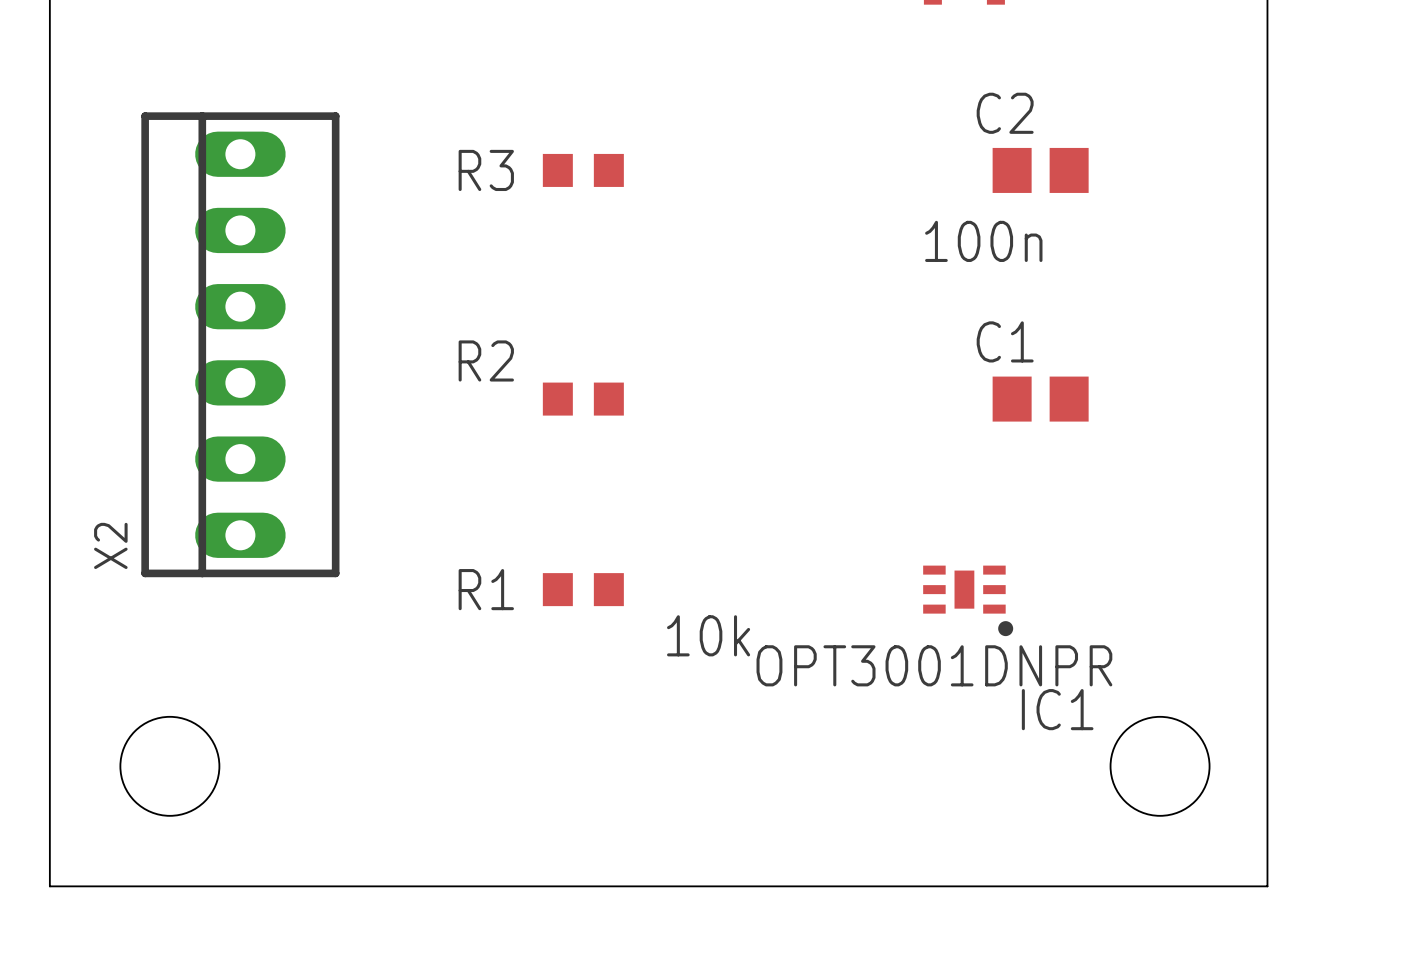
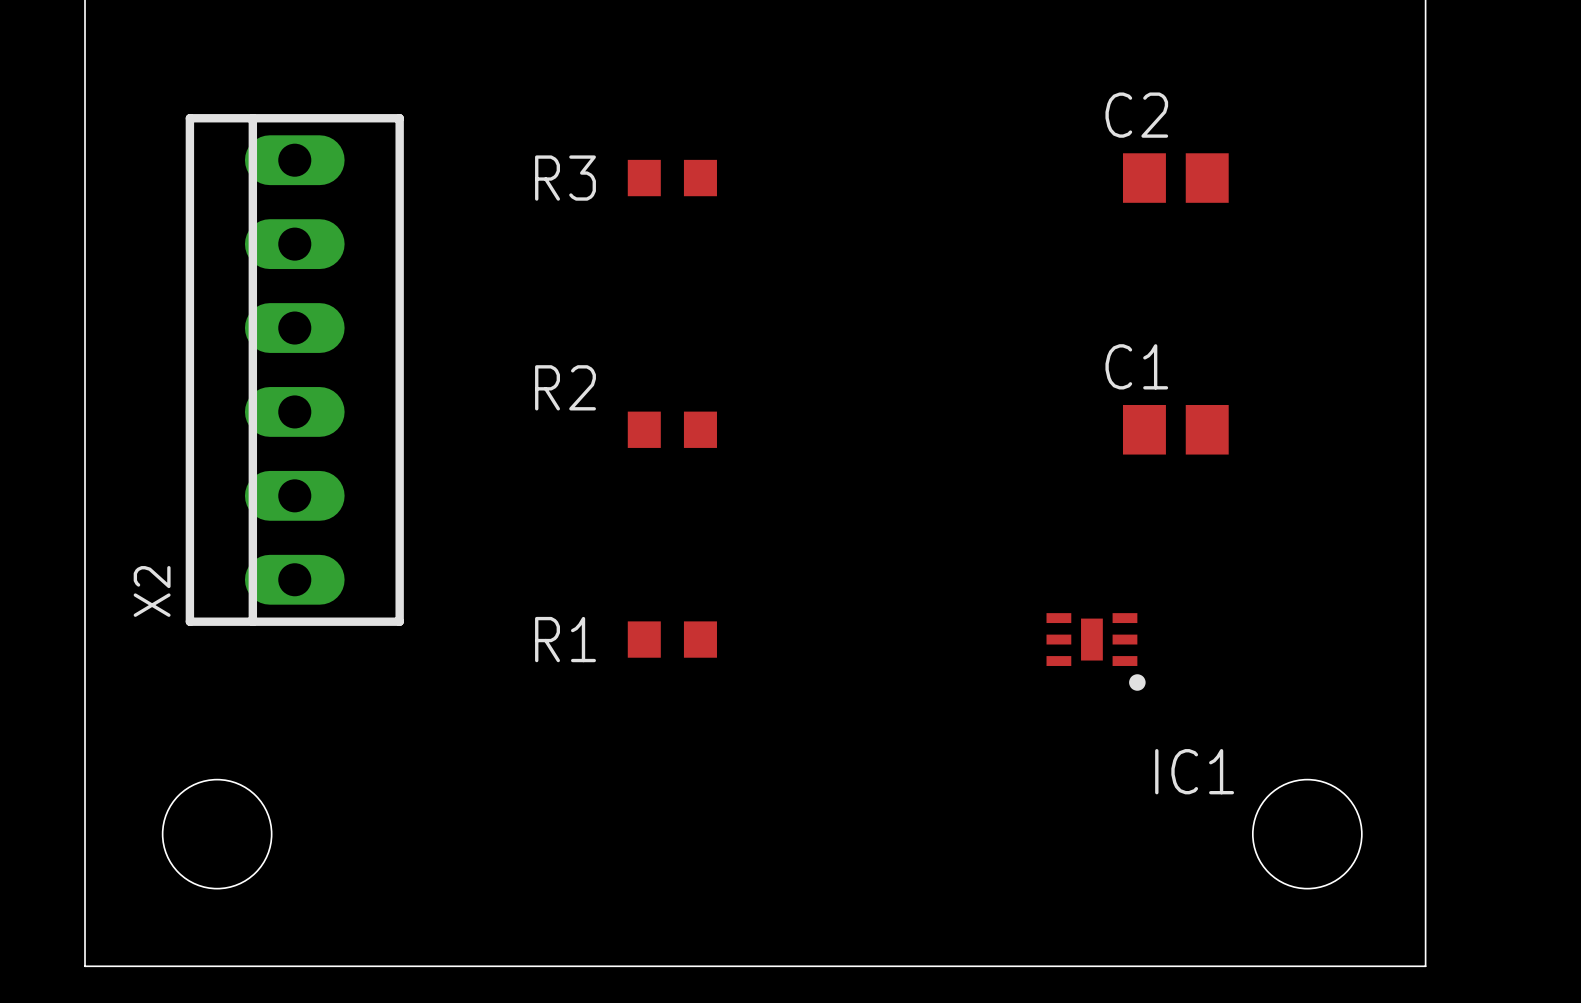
C2 value: 100n (983, 241) -> none
R1 value: 10k (708, 635) -> none
IC1 value: OPT3001DNPR (934, 665) -> none

